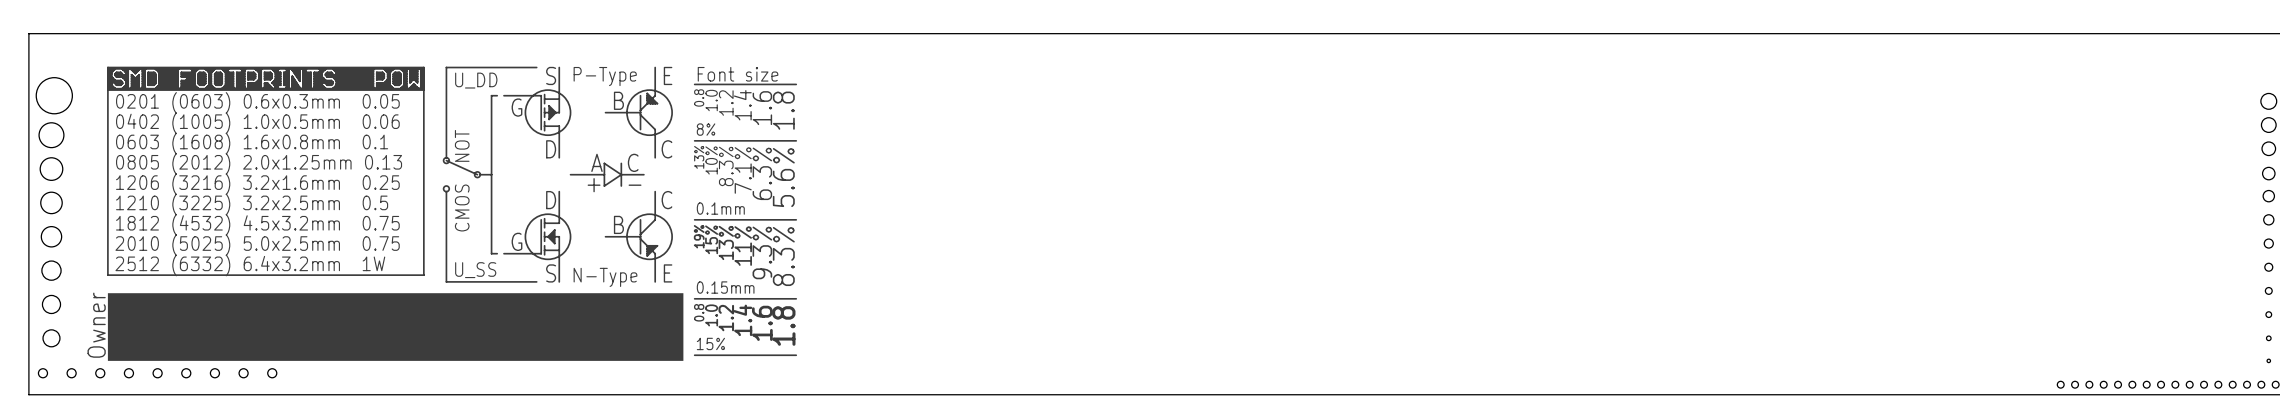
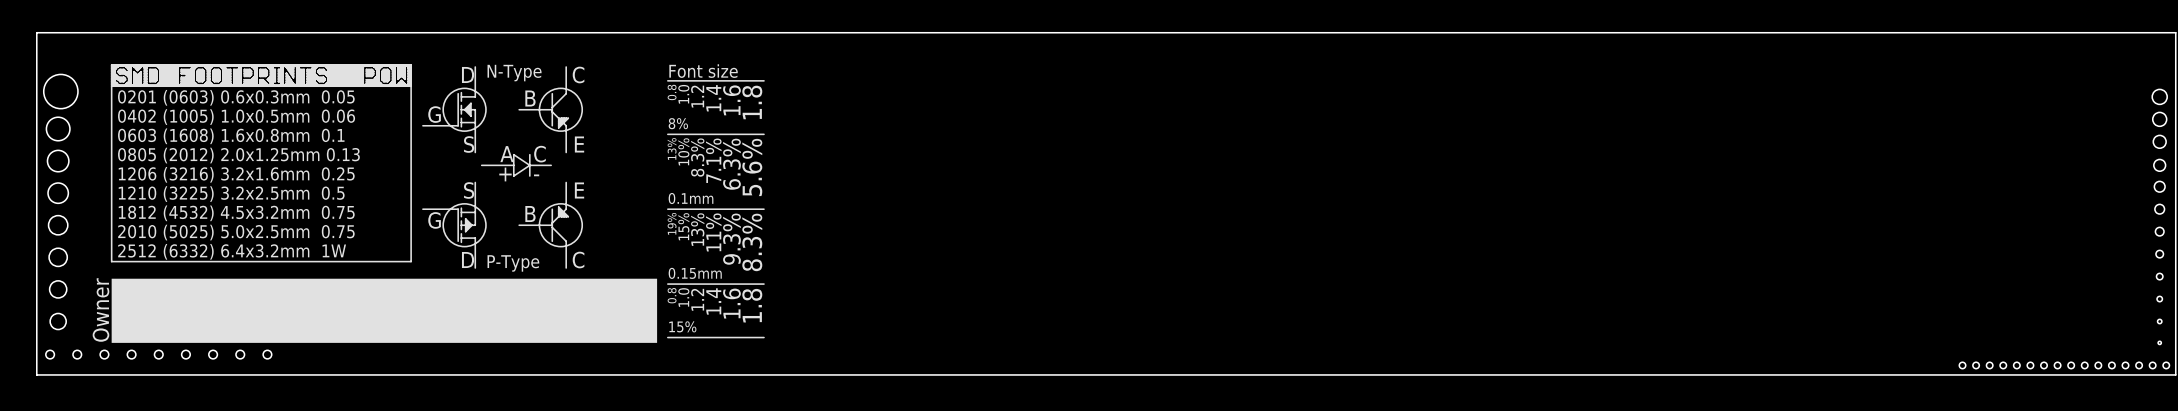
line: (536, 67) (446, 67) (446, 157) -> none
text position: P-Type (605, 76) -> P-Type (513, 263)
text: U_DD (476, 80) -> none
line: (497, 95) (491, 95) (491, 253) (497, 253) -> none
drawing position: (537, 112) -> (454, 225)
drawing position: (638, 112) -> (550, 225)
drawing: [442, 156, 451, 165] -> none
line: (446, 160) (477, 174) -> none
drawing: [473, 171, 482, 179] -> none
line: (491, 174) (480, 174) -> none
drawing position: (607, 174) -> (516, 165)
text: CMOS NOT (462, 180) -> none
drawing: [442, 185, 451, 193] -> none
line: (446, 191) (446, 281) (536, 281) -> none
drawing position: (537, 236) -> (454, 109)
drawing position: (638, 236) -> (550, 109)
text: U_SS (475, 270) -> none
text position: N-Type (605, 277) -> N-Type (514, 73)

